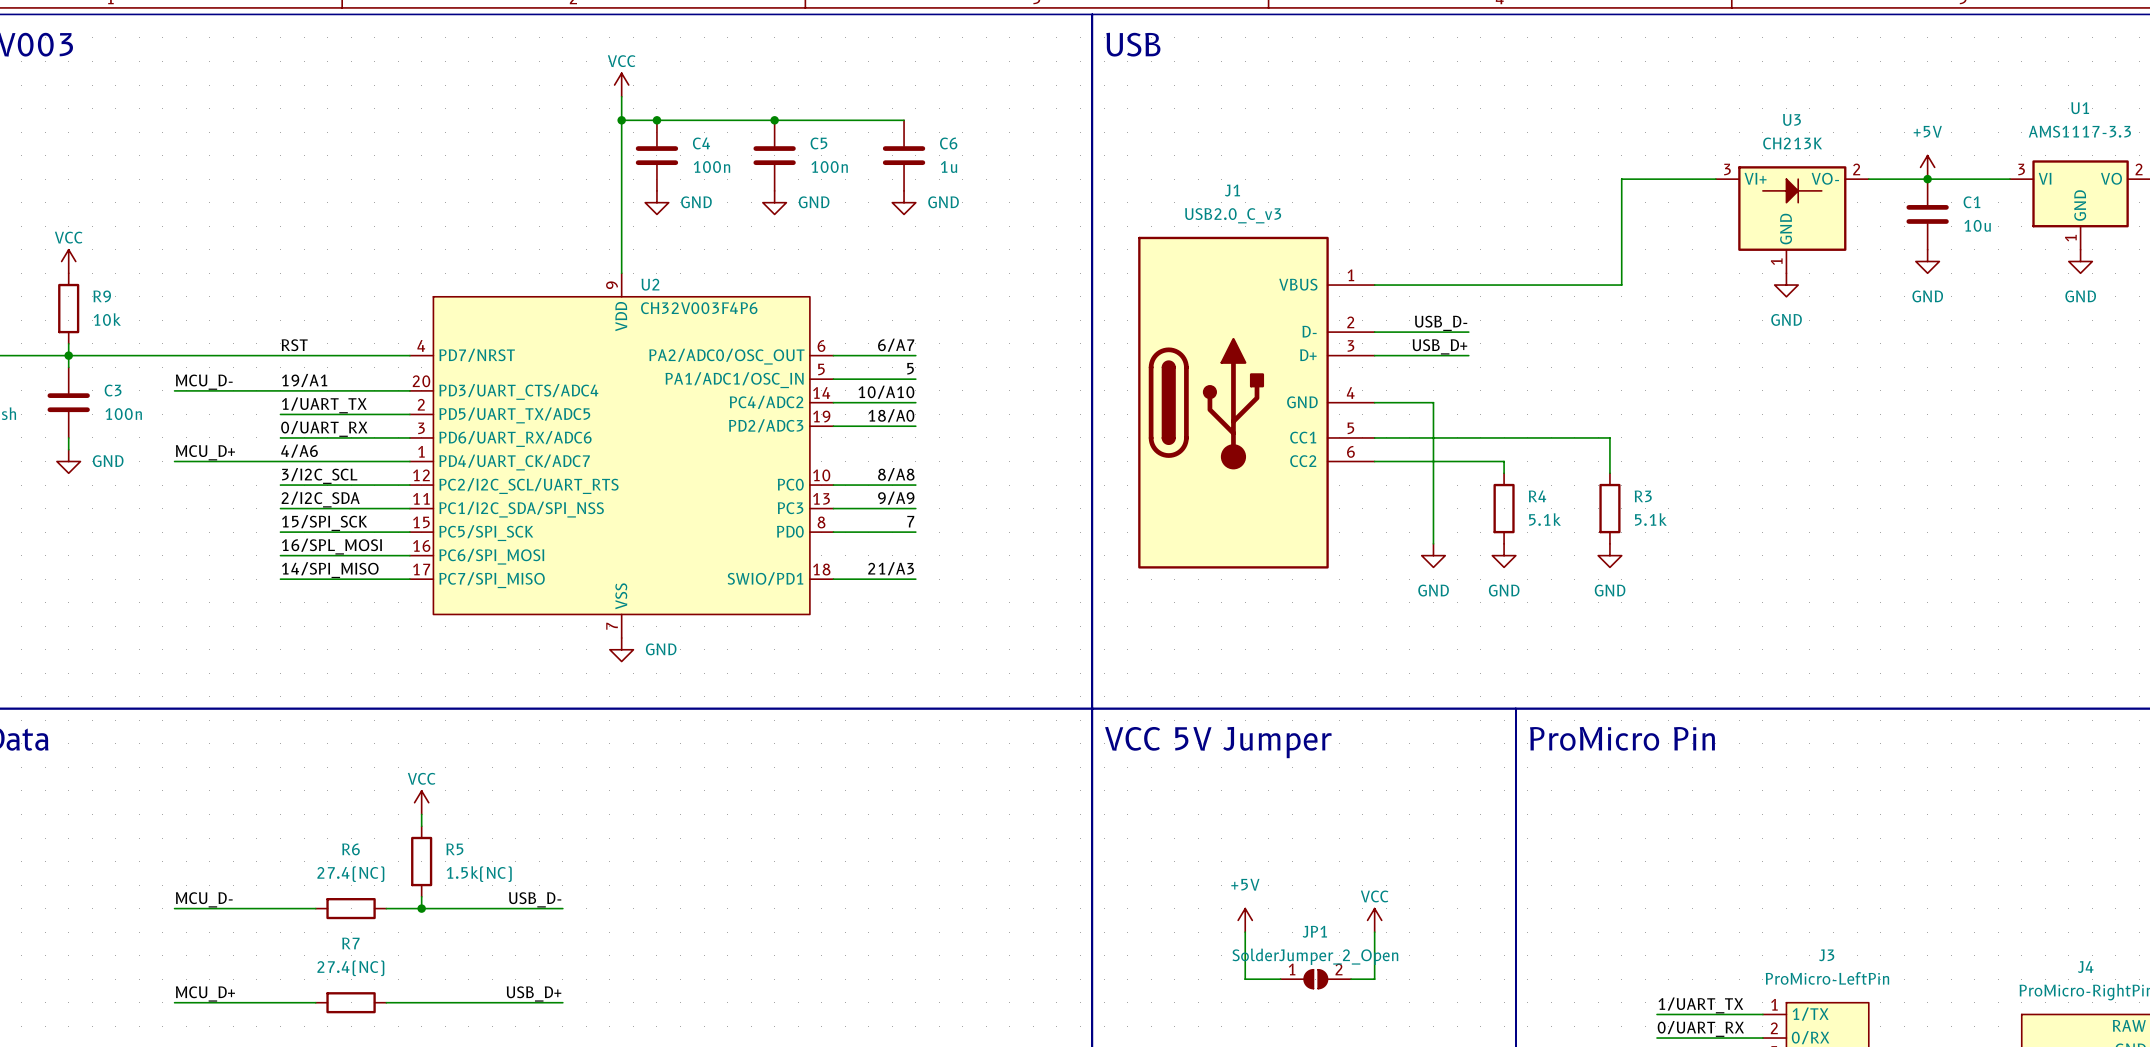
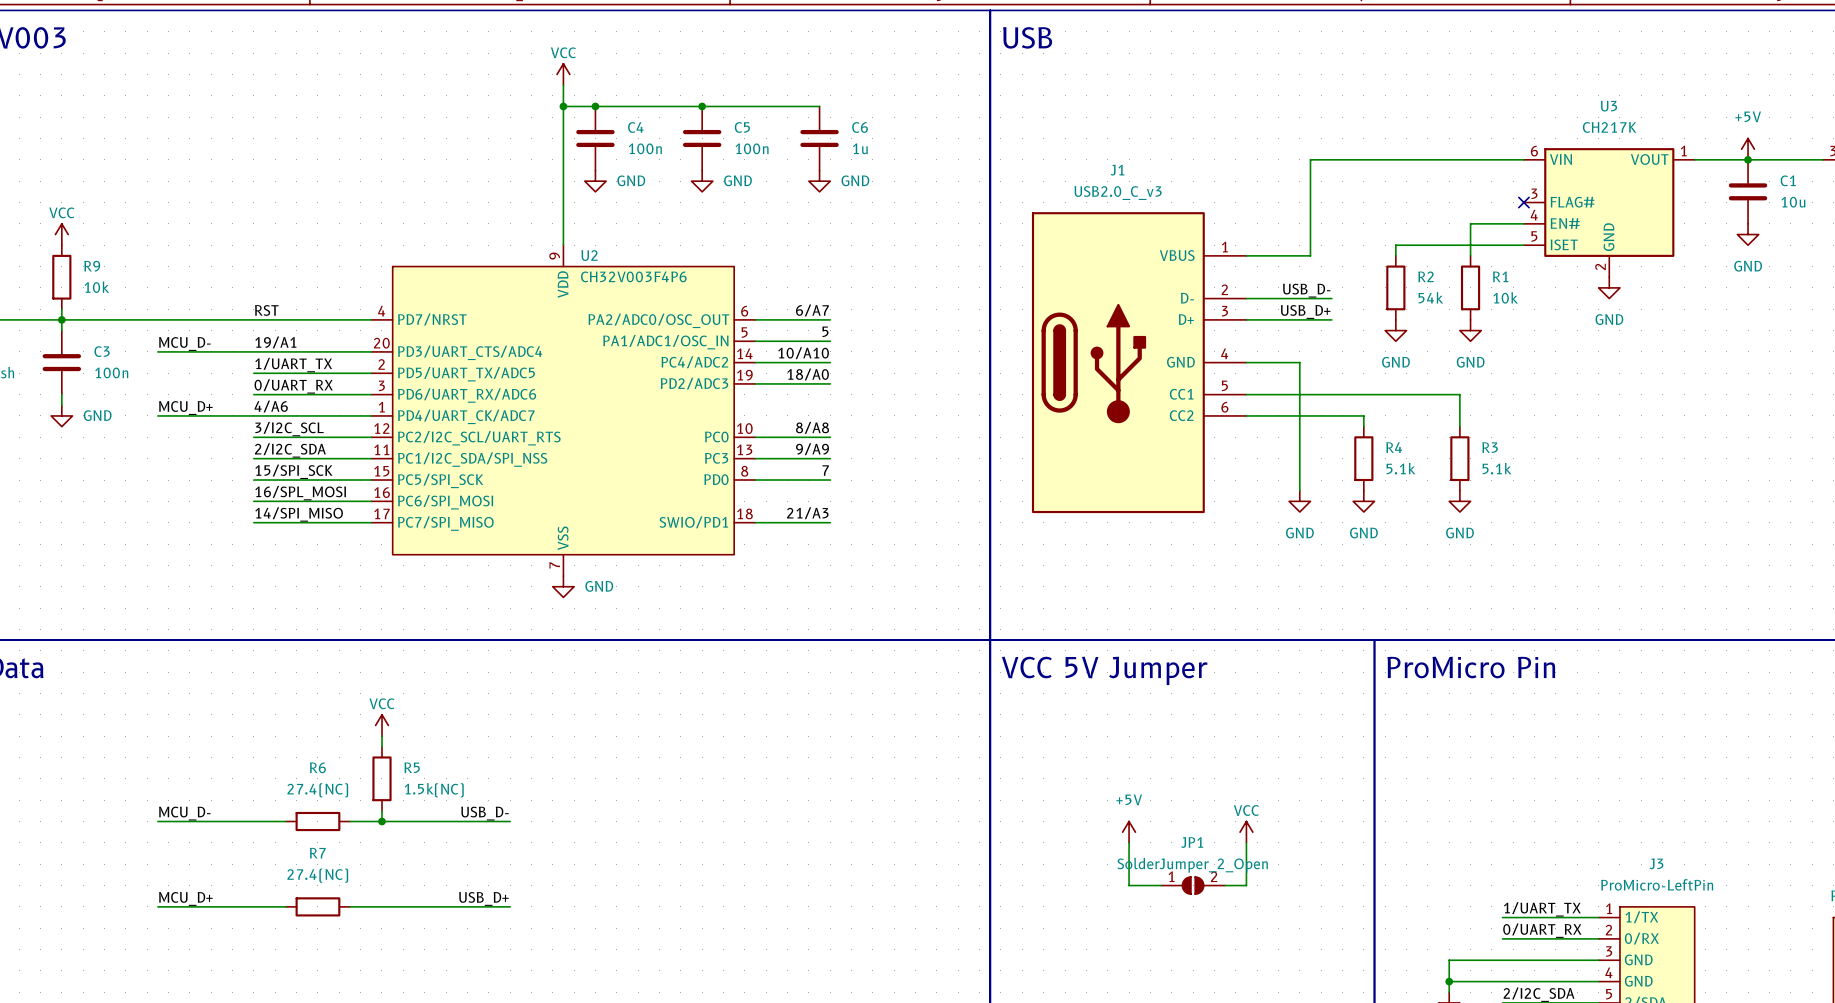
U3 value: CH213K (1792, 143) -> CH217K (1609, 127)
U3 symbol: [1715, 166, 1869, 274] -> [1523, 148, 1695, 278]
wire: (1621, 179) (1621, 249) -> (1523, 223) (1470, 223)
no-connect mark: none -> (1523, 202)
wire: none -> (1523, 245) (1395, 245) (1395, 255)
wire: (1445, 285) (1621, 285) -> (1310, 255) (1310, 159) (1470, 159)
power symbol position: GND (1786, 285) -> GND (1609, 287)
R2: none -> 54k (1395, 287)
R1: none -> 10k (1470, 287)
power symbol: none -> GND (1395, 330)
power symbol: none -> GND (1470, 330)

